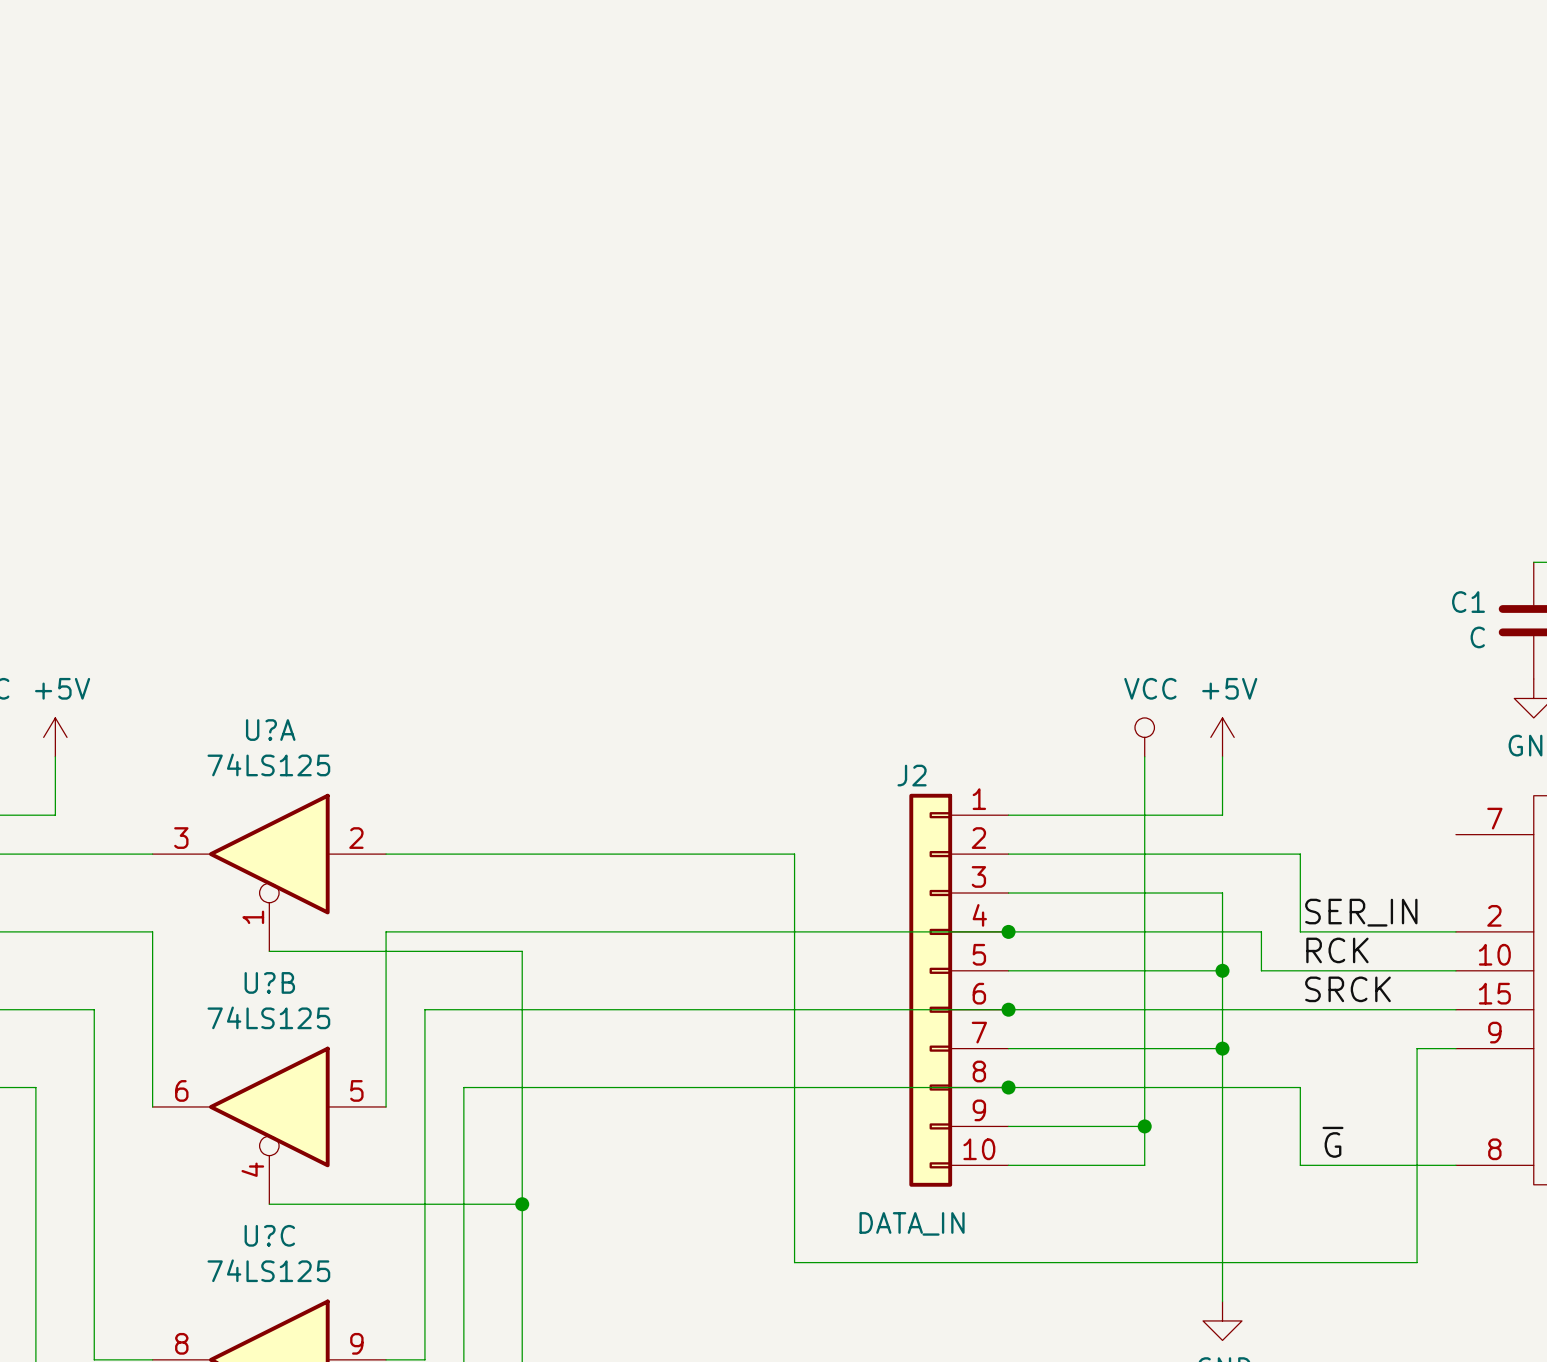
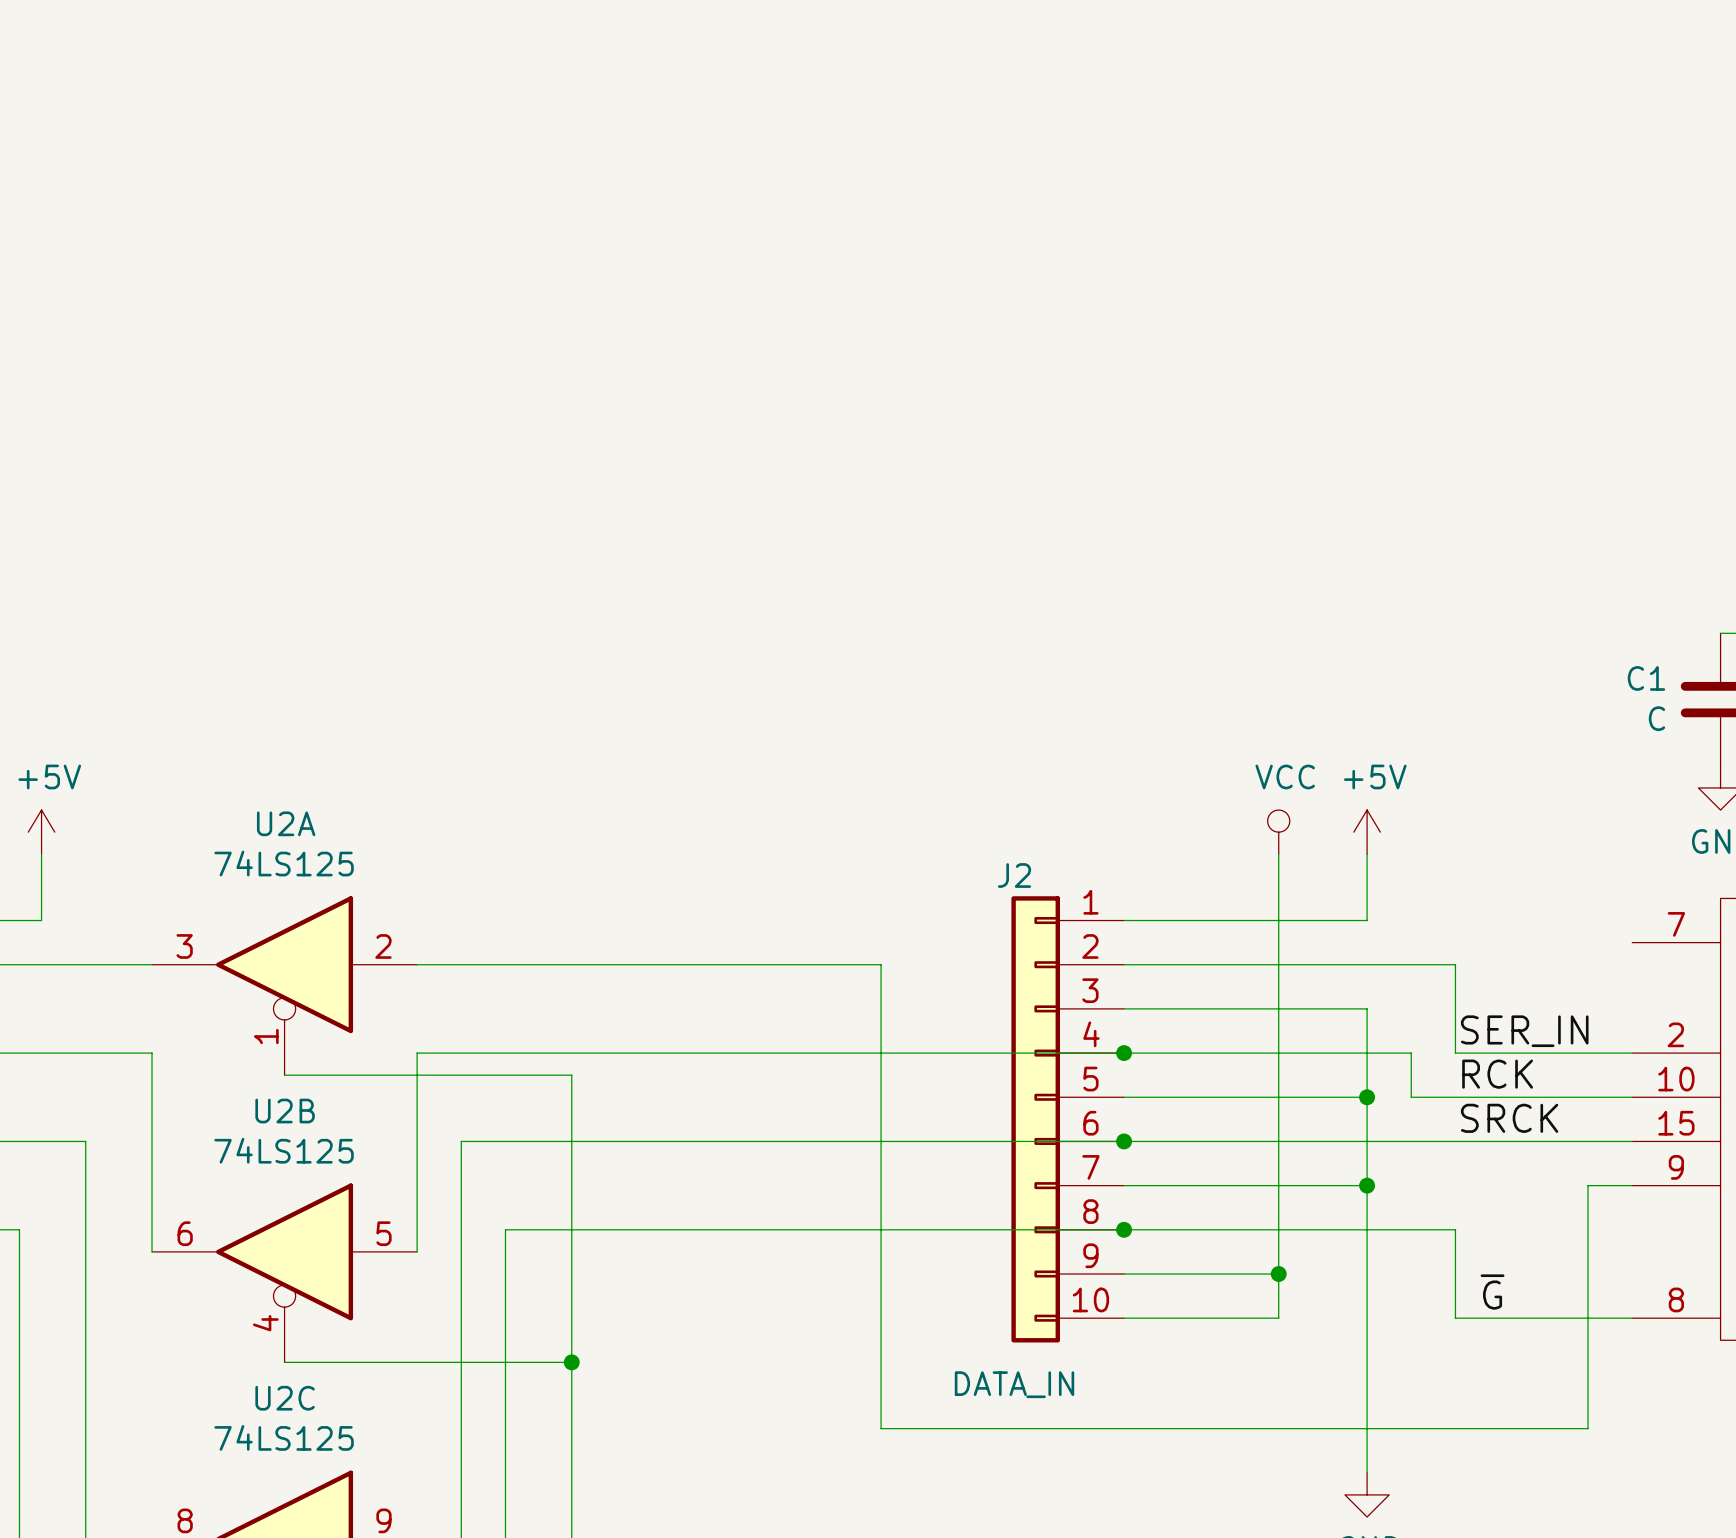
U?A name: U?A (270, 730) -> U2A (286, 823)
U?B name: U?B (269, 982) -> U2B (285, 1111)
U?C name: U?C (269, 1235) -> U2C (285, 1398)

